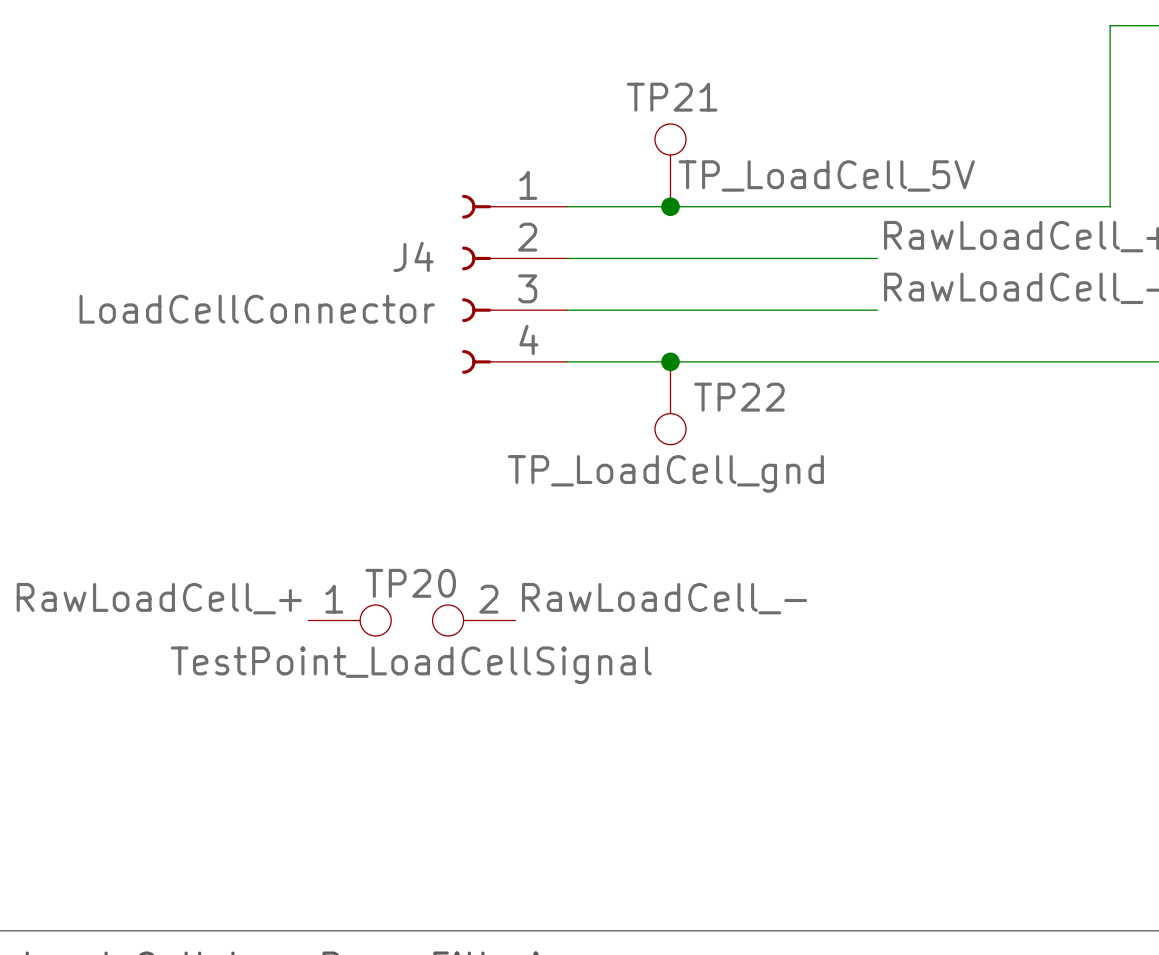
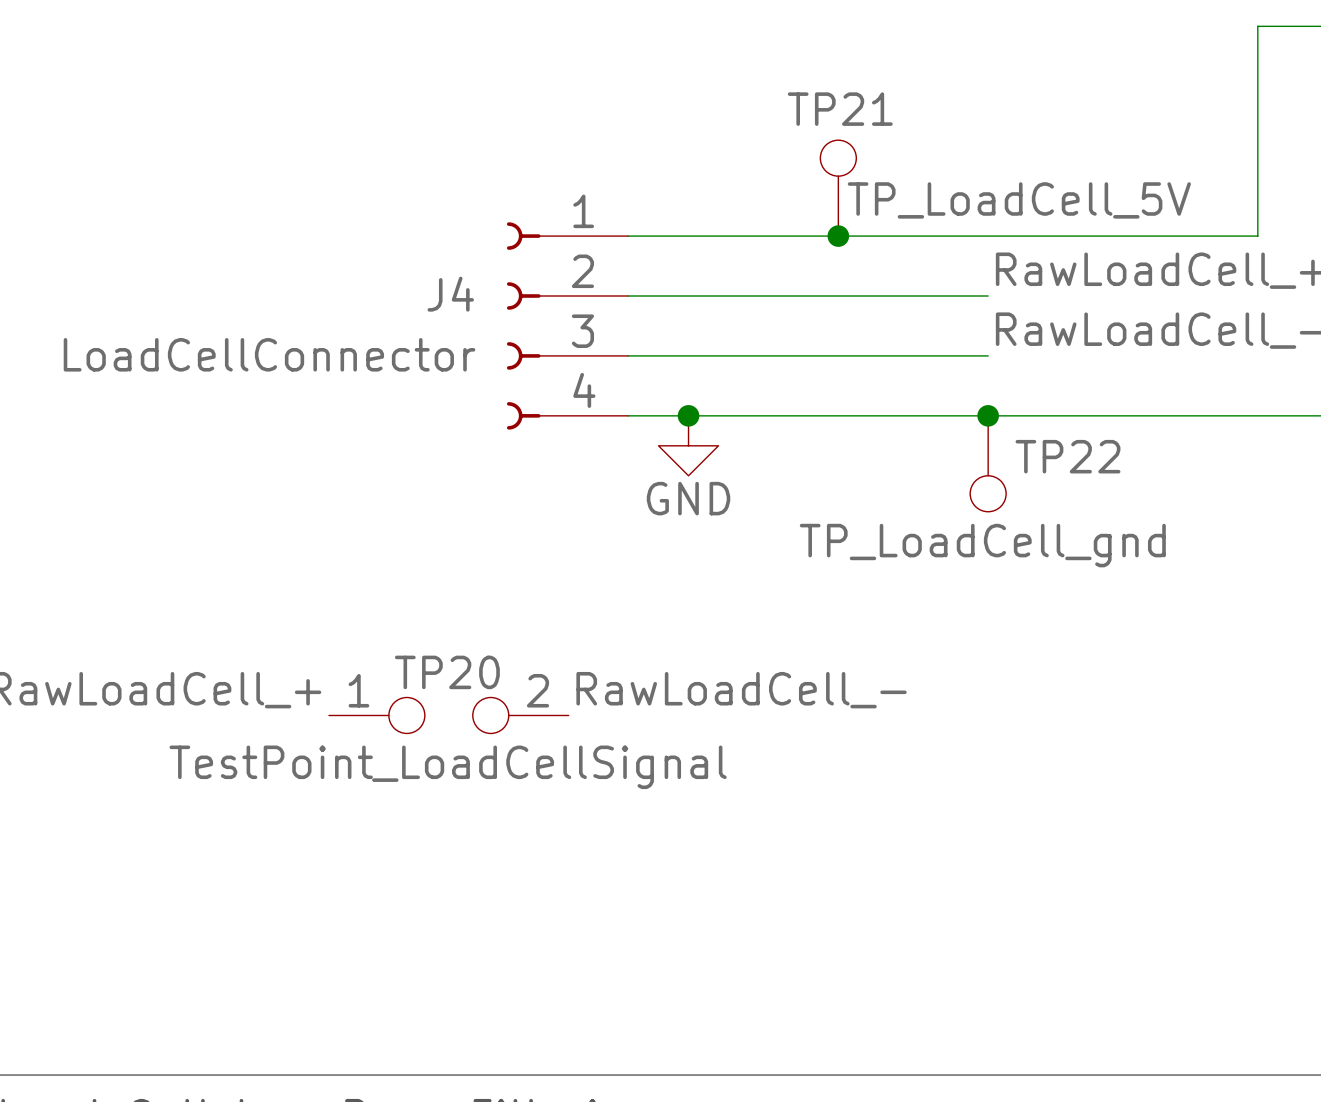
TP21 position: (670, 165) -> (838, 188)
junction position: (670, 206) -> (838, 236)
junction position: (670, 361) -> (688, 415)
junction: none -> (988, 415)
power symbol: none -> GND (688, 445)
TP22 position: (670, 403) -> (988, 463)

